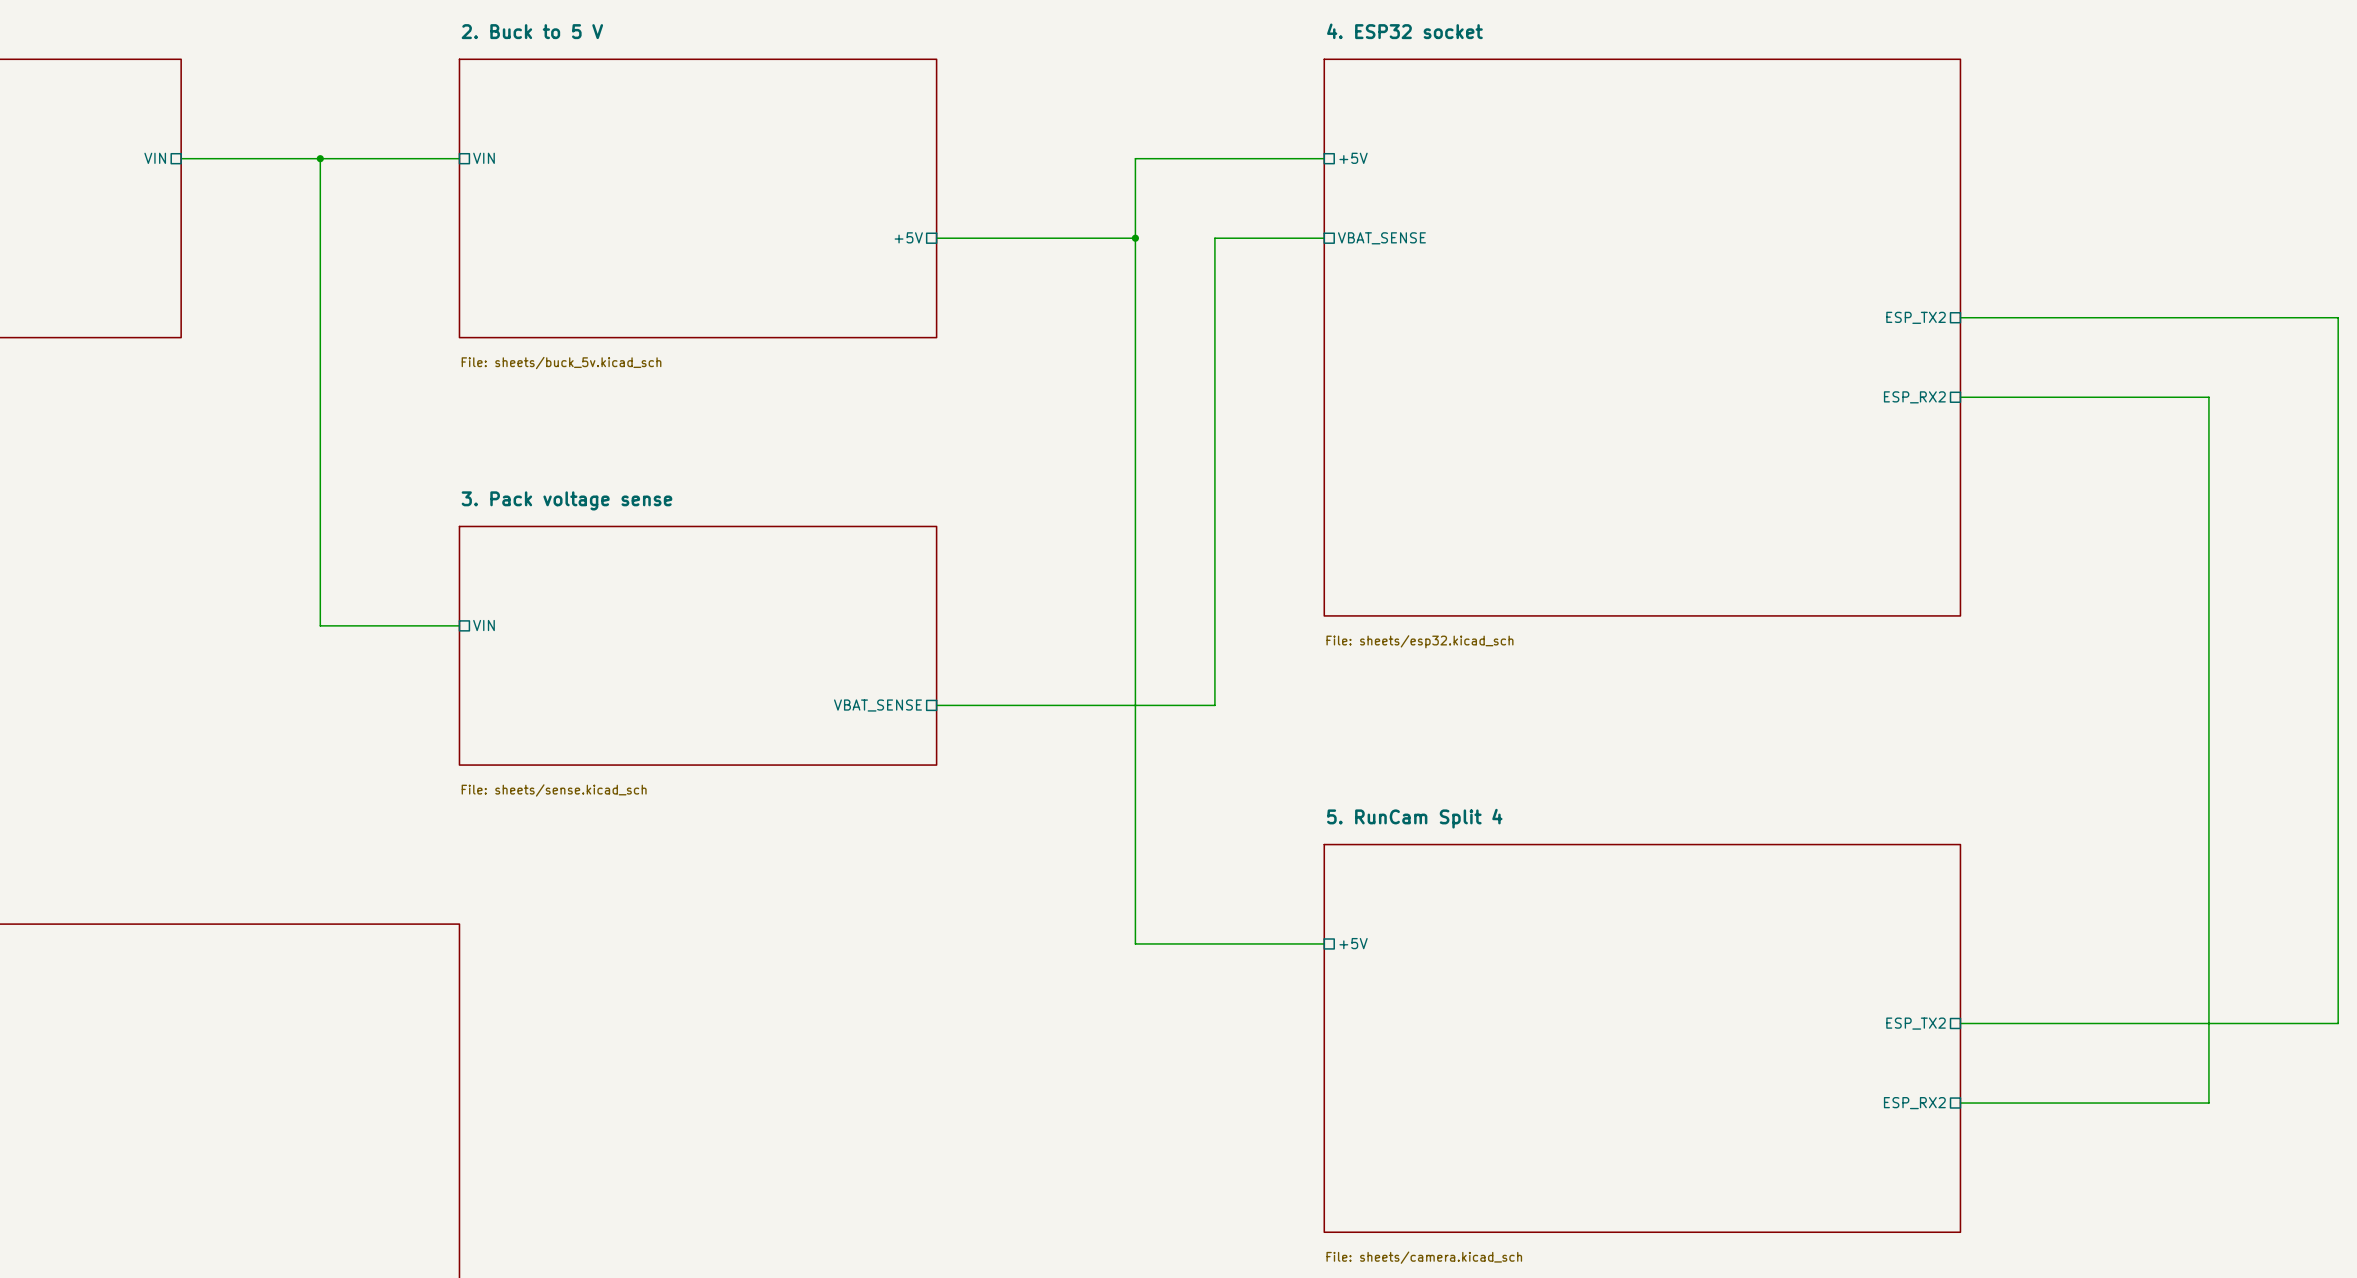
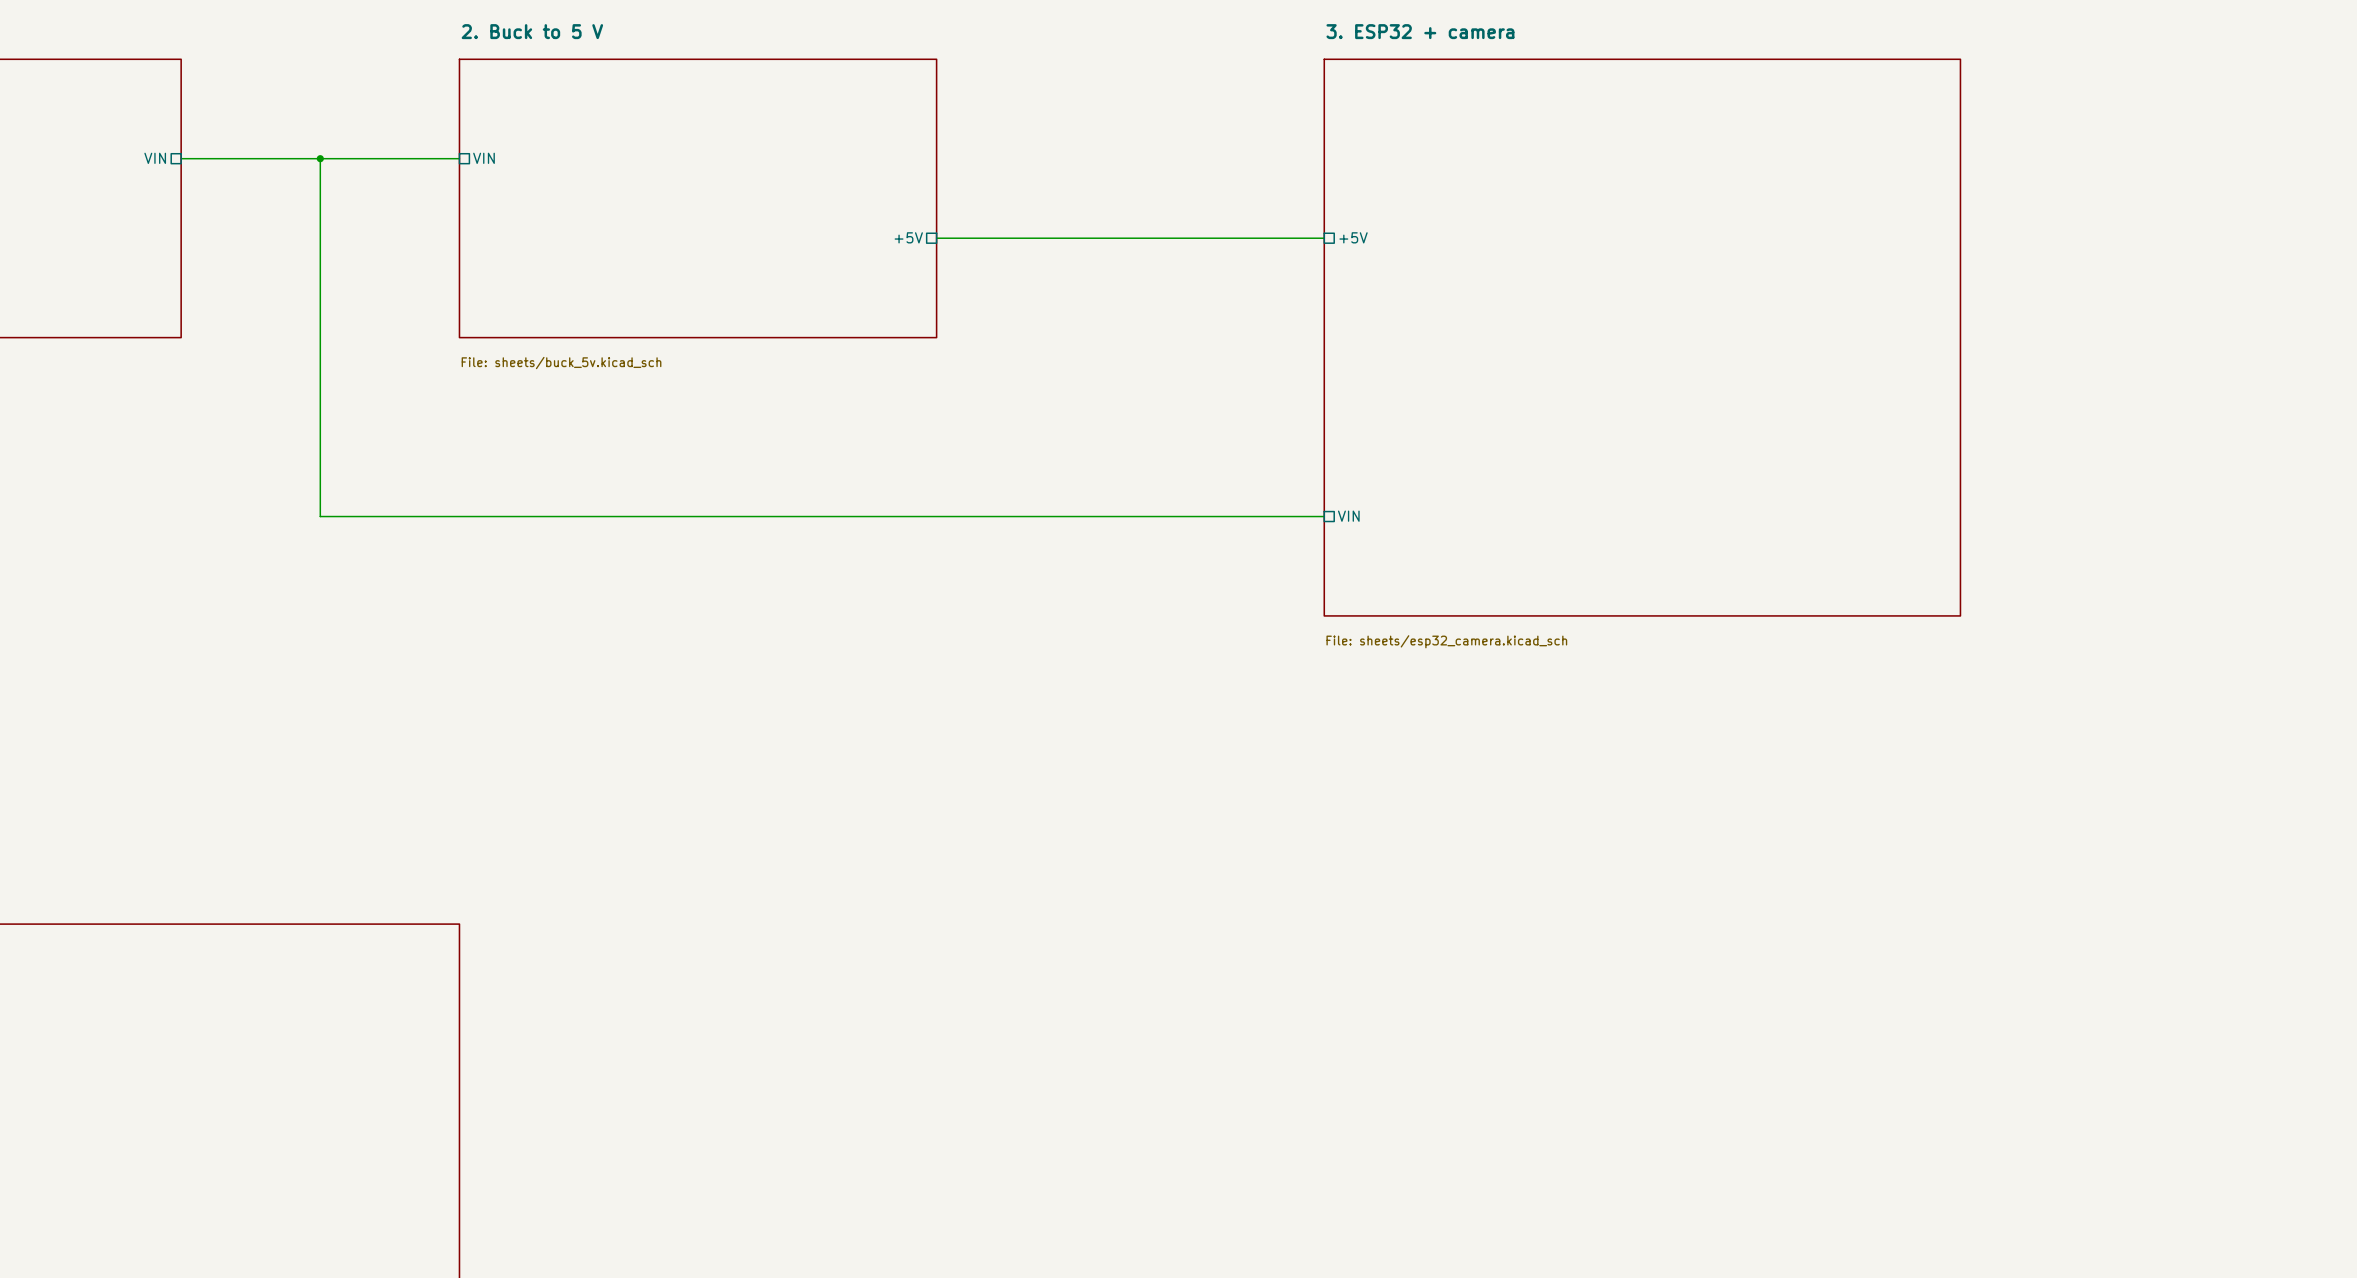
sheet 4. ESP32 socket name: 4. ESP32 socket (1404, 31) -> 3. ESP32 + camera (1420, 31)
wire: (1324, 158) (1135, 158) (1135, 943) (1324, 943) -> none
sheet pin: +5V (1353, 158) -> none
junction: (1135, 238) -> none
wire: (1214, 238) (1214, 705) (936, 705) -> (1214, 238) (1135, 238)
sheet pin: VBAT_SENSE (1381, 238) -> +5V (1353, 237)
sheet pin: ESP_TX2 (1916, 317) -> none
wire: (1960, 317) (2338, 317) (2338, 1023) (1960, 1023) -> none
sheet pin: ESP_RX2 (1914, 397) -> none
wire: (1960, 397) (2208, 397) (2208, 1103) (1960, 1103) -> none
wire: (320, 516) (320, 625) (459, 625) -> (320, 516) (1324, 516)
sheet pin: none -> VIN (1348, 516)
sheet pin: VIN (484, 625) -> none
sheet 4. ESP32 socket value: File: sheets/esp32.kicad_sch (1419, 641) -> File: sheets/esp32_camera.kicad_sch (1446, 641)
sheet 3. Pack voltage sense: File: sheets/sense.kicad_sch (698, 645) -> none
sheet pin: VBAT_SENSE (877, 705) -> none
sheet pin: +5V (1353, 943) -> none
sheet pin: ESP_TX2 (1916, 1023) -> none
sheet 5. RunCam Split 4: File: sheets/camera.kicad_sch (1642, 1038) -> none
sheet pin: ESP_RX2 (1914, 1103) -> none

